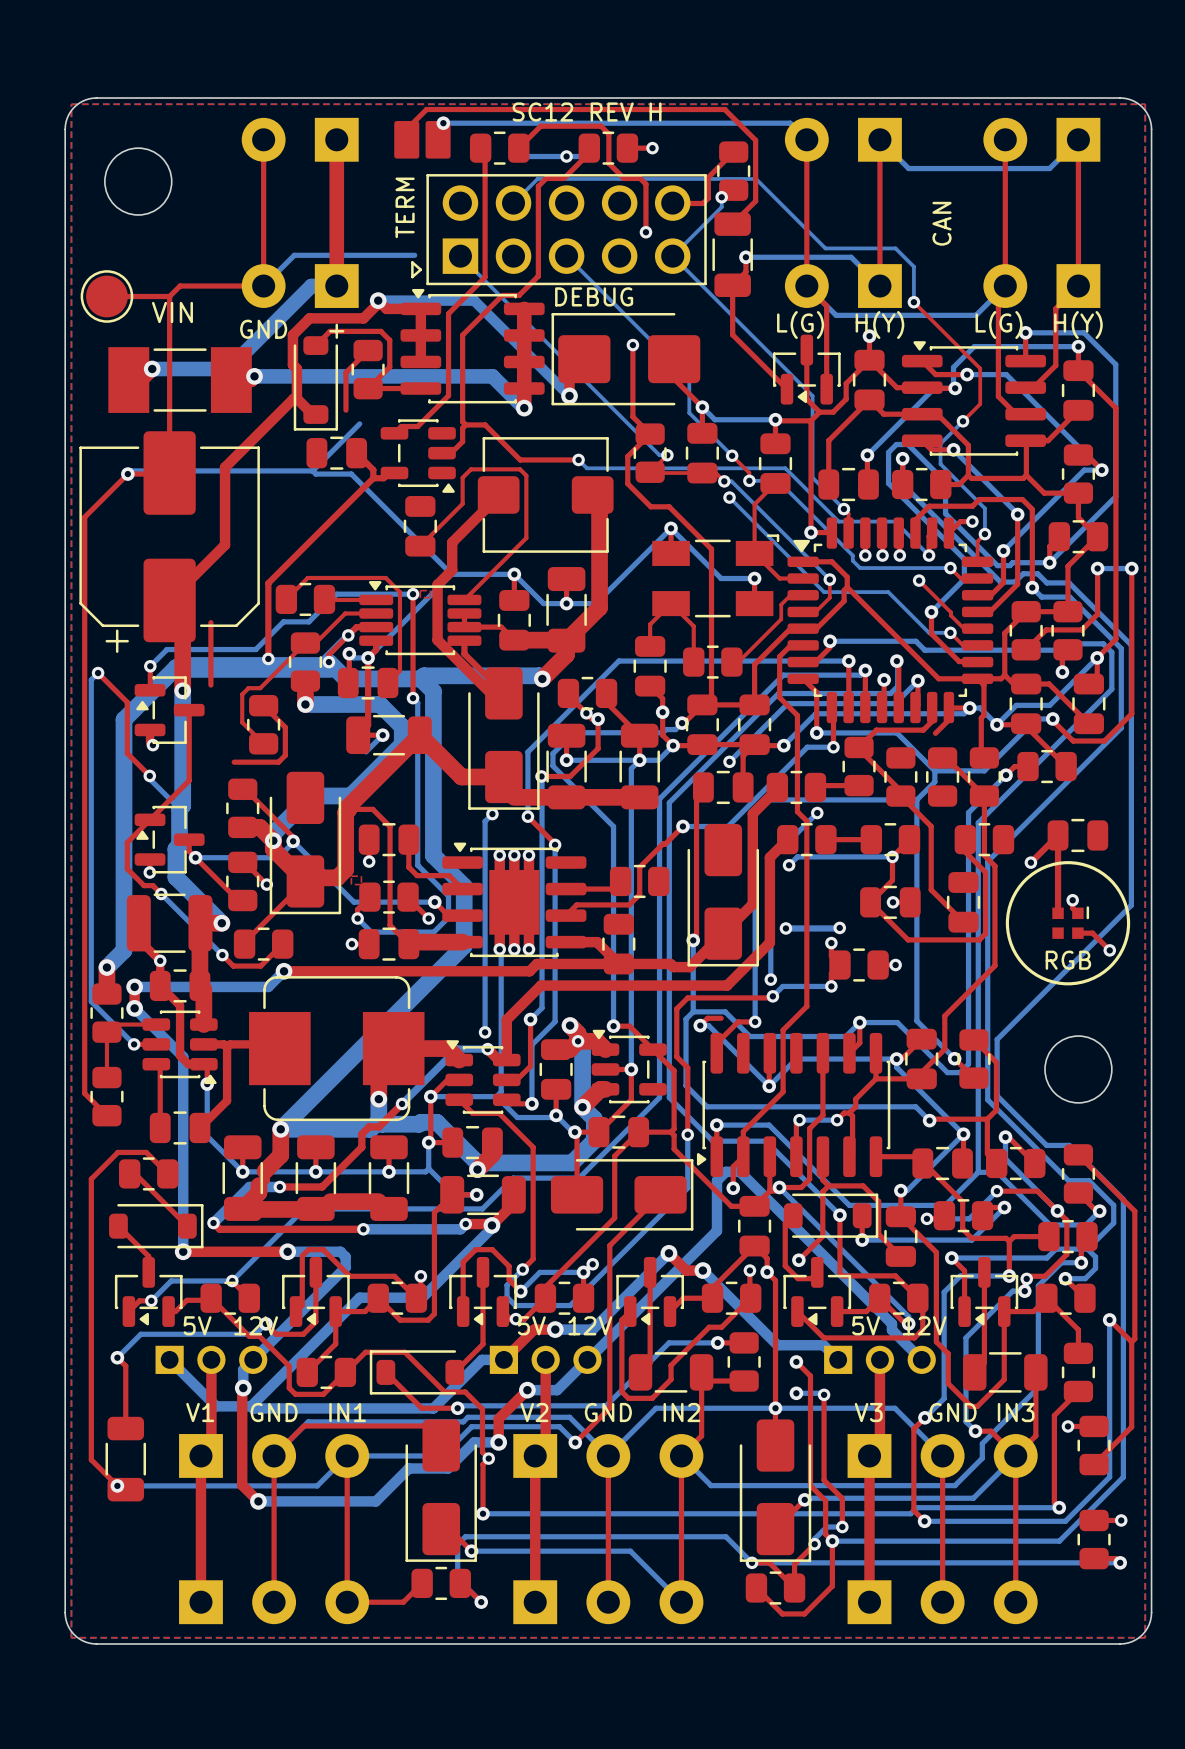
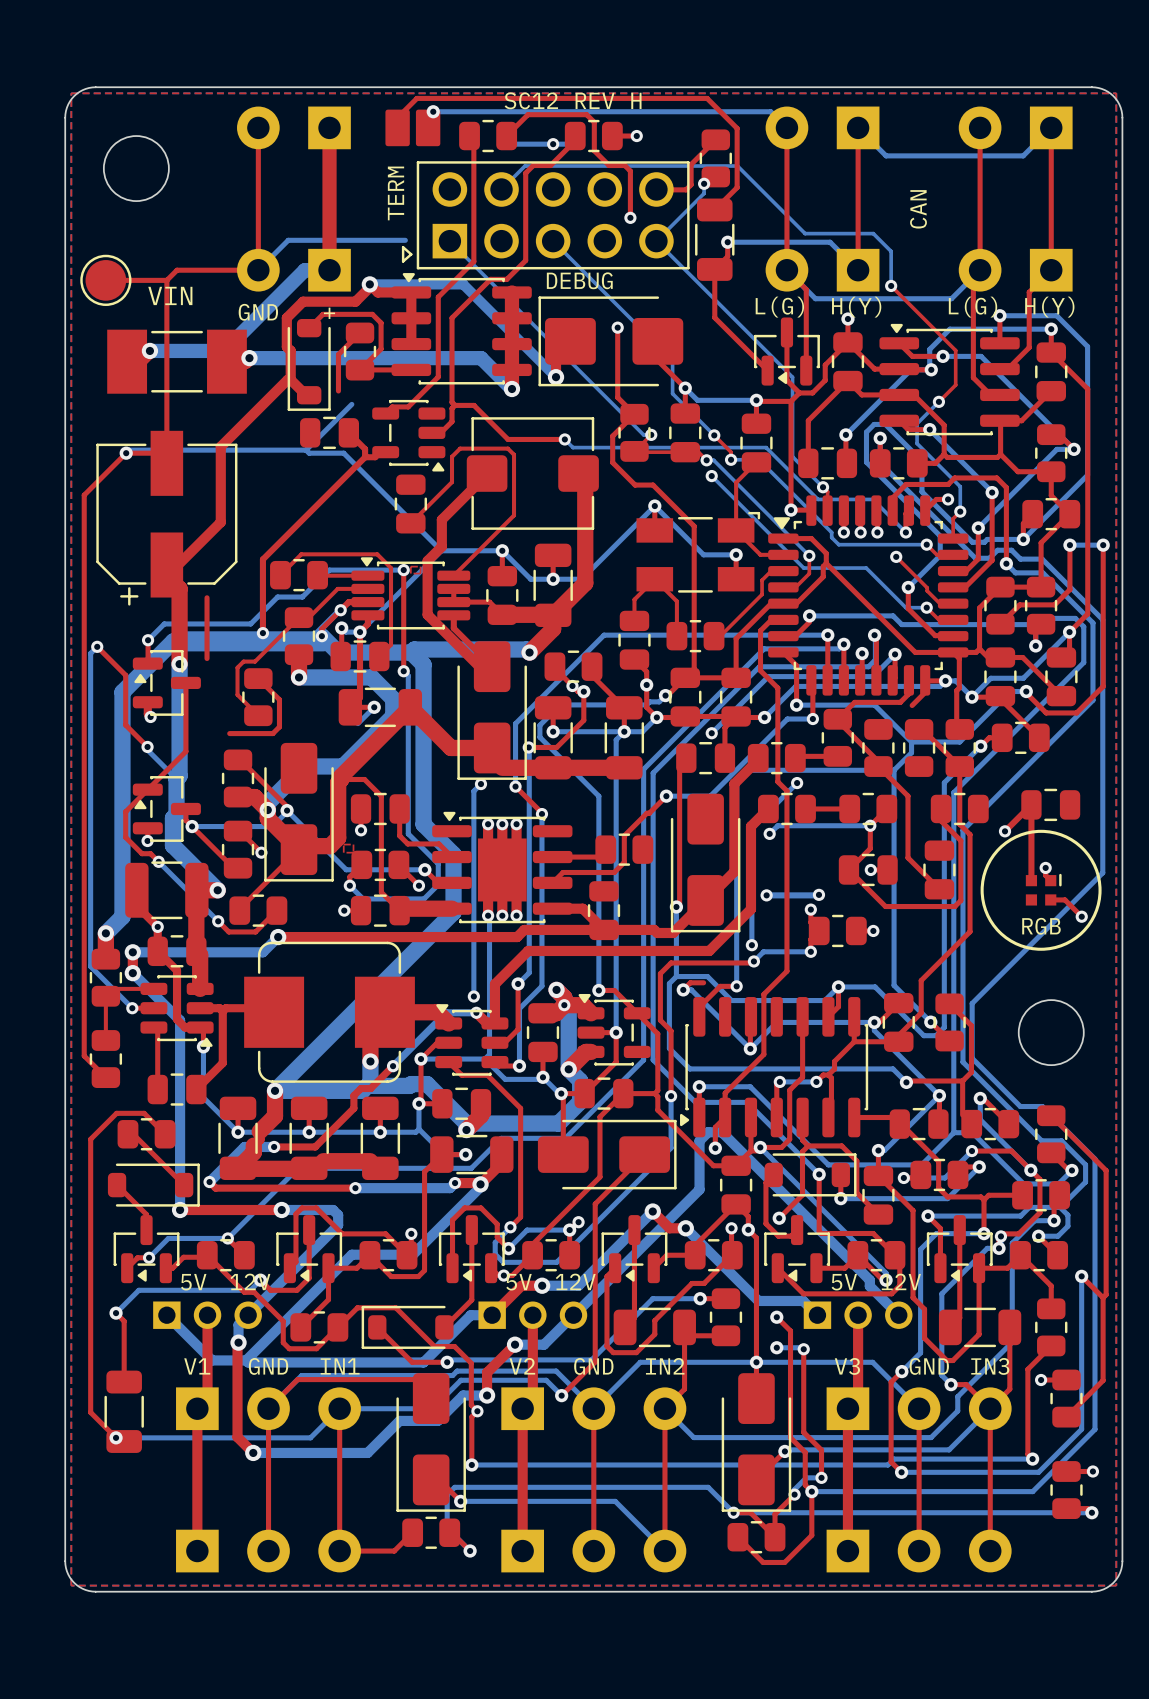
part footprint: [79, 431, 260, 653] -> [96, 430, 238, 606]

